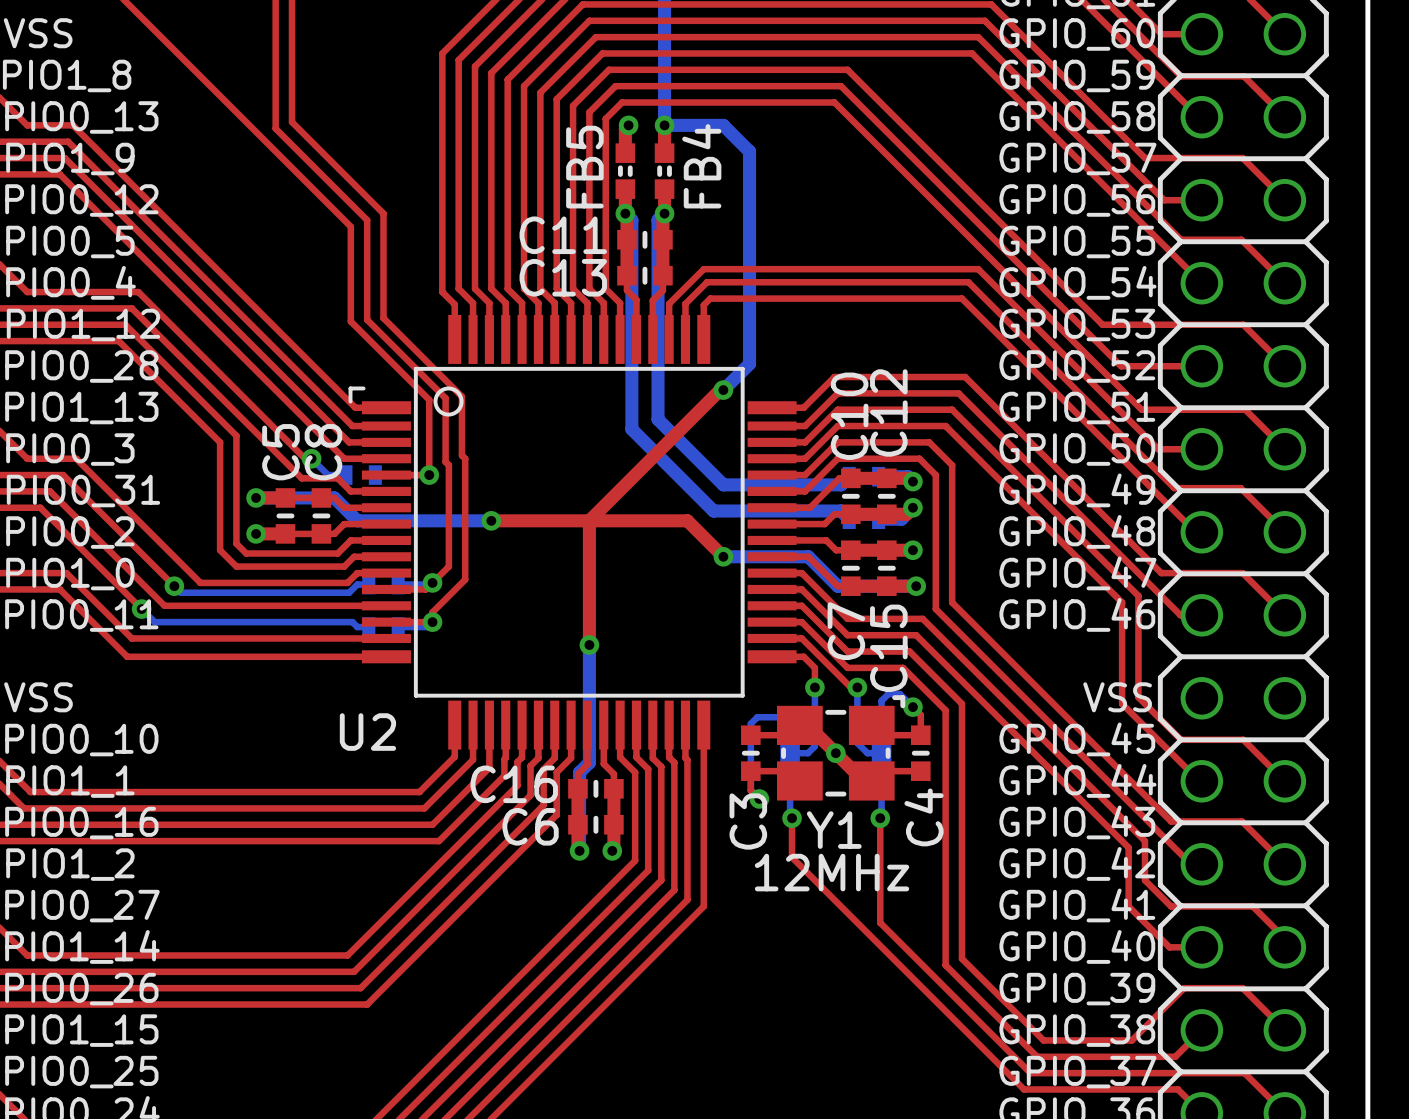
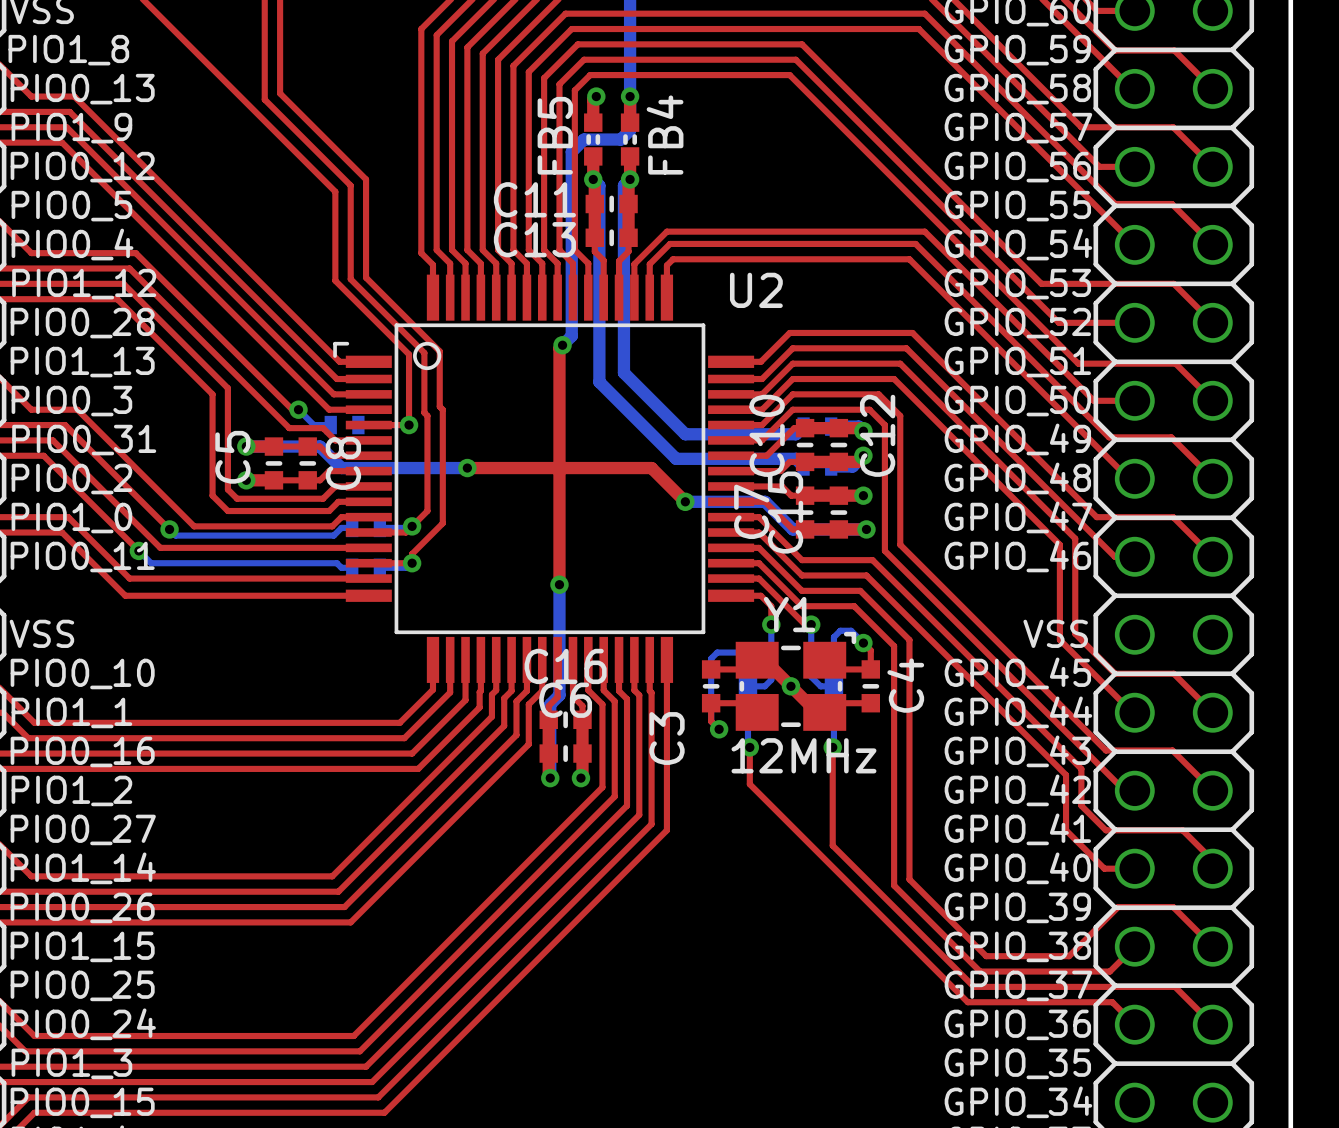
bottom track: (664, 125) (723, 125) (749, 151) (749, 363) (723, 390) -> (630, 96) (630, 130) (620, 139) (584, 139) (571, 151) (571, 336) (562, 345)
top track: (723, 390) (720, 390) (589, 520) -> (562, 345) (559, 348) (559, 468)
via position: (723, 390) -> (562, 345)
C12 name position: C12 (888, 412) -> C12 (877, 435)
C10 name position: C10 (849, 416) -> C10 (767, 435)
C5 name position: C5 (280, 452) -> C5 (232, 457)
C8 name position: C8 (323, 452) -> C8 (343, 463)
C7 name position: C7 (846, 631) -> C7 (751, 511)
C15 name position: C15 (888, 648) -> C15 (785, 512)
U2 name position: U2 (367, 732) -> U2 (756, 290)
C16 name position: C16 (514, 784) -> C16 (565, 666)
C4 name position: C4 (924, 817) -> C4 (905, 685)
C3 name position: C3 (748, 821) -> C3 (667, 738)
C6 name position: C6 (530, 826) -> C6 (565, 700)
Y1 name position: Y1 (834, 830) -> Y1 (789, 614)
Y1 value position: 12MHz (832, 872) -> 12MHz (803, 755)

